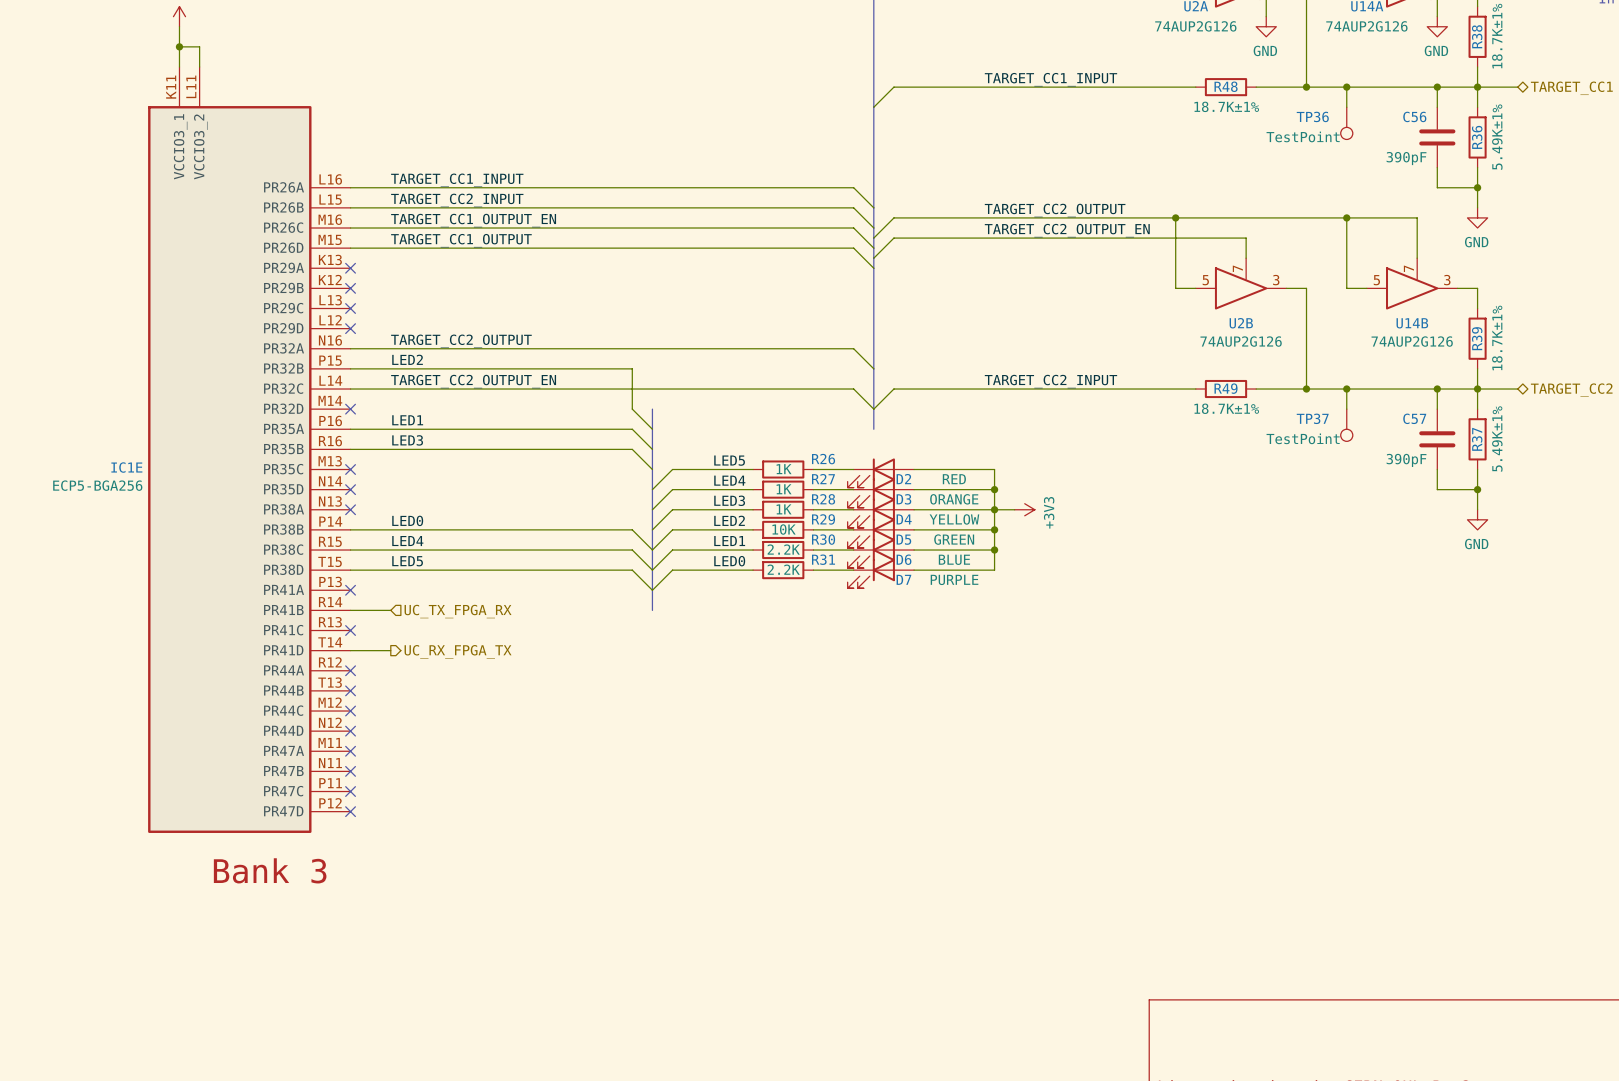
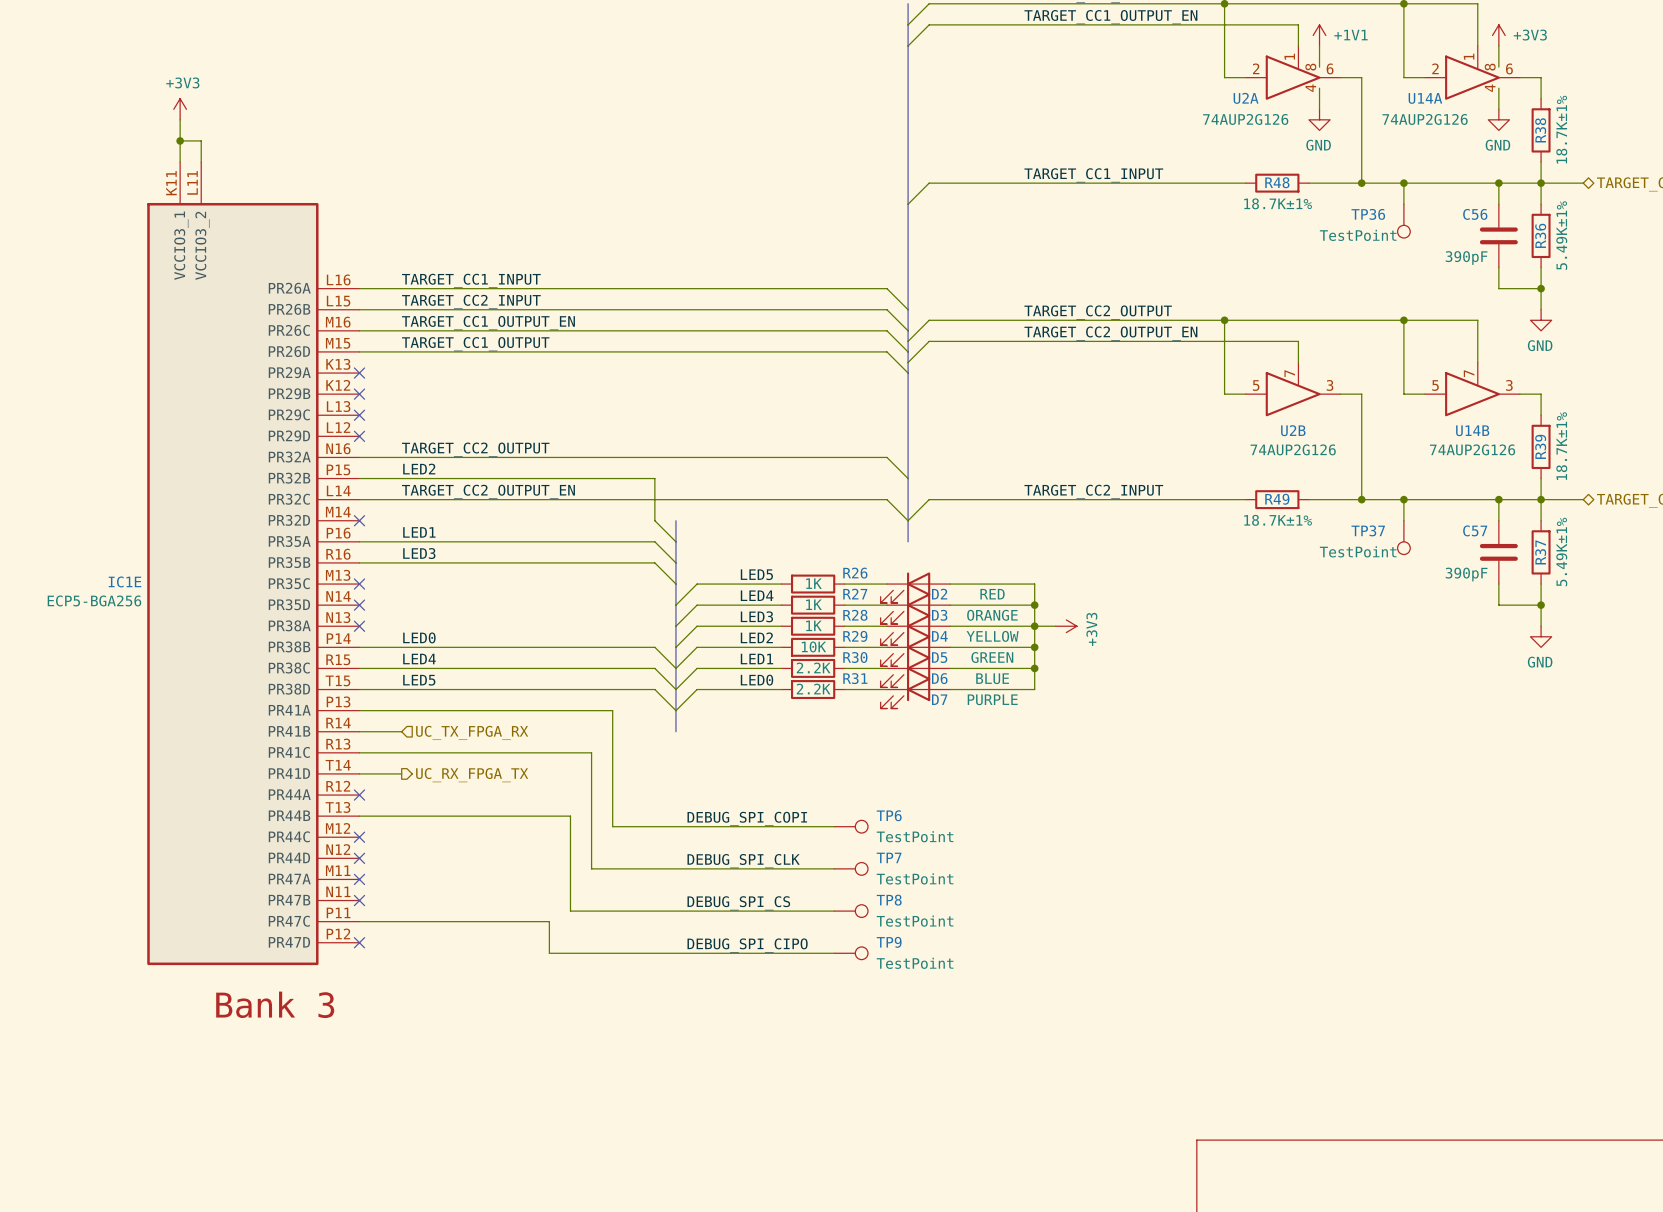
wire: none -> (359, 710) (612, 710) (612, 826) (834, 826)
no-connect mark: (350, 590) -> none
wire: none -> (359, 752) (591, 752) (591, 868) (834, 868)
no-connect mark: (350, 630) -> none
wire: none -> (359, 816) (570, 816) (570, 911) (834, 911)
no-connect mark: (350, 690) -> none
label: none -> DEBUG_SPI_COPI (747, 818)
TP6: none -> TestPoint (851, 826)
label: none -> DEBUG_SPI_CLK (743, 861)
TP7: none -> TestPoint (851, 868)
label: none -> DEBUG_SPI_CS (738, 903)
TP8: none -> TestPoint (851, 911)
wire: none -> (359, 921) (549, 921) (549, 953) (834, 953)
no-connect mark: (350, 791) -> none
label: none -> DEBUG_SPI_CIPO (747, 945)
TP9: none -> TestPoint (851, 953)

